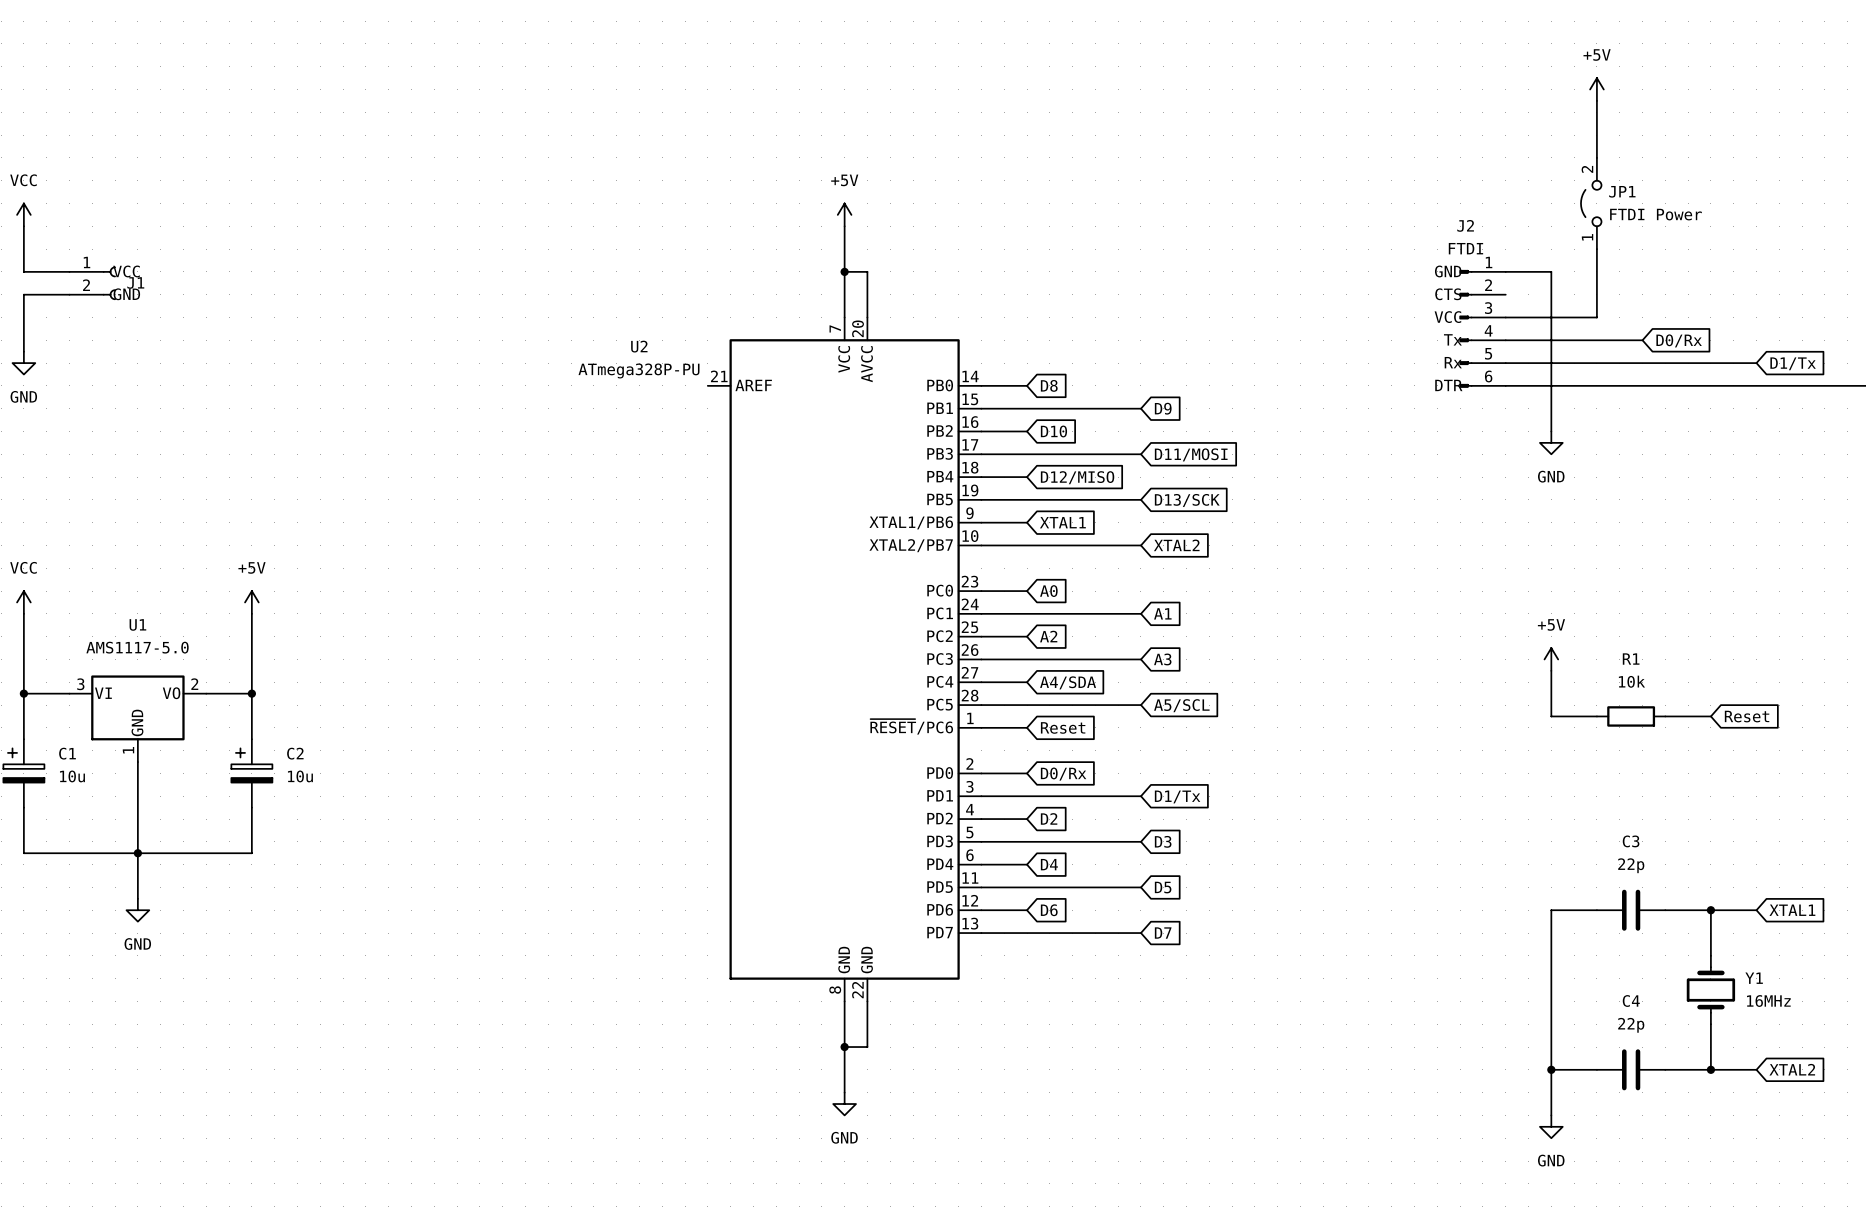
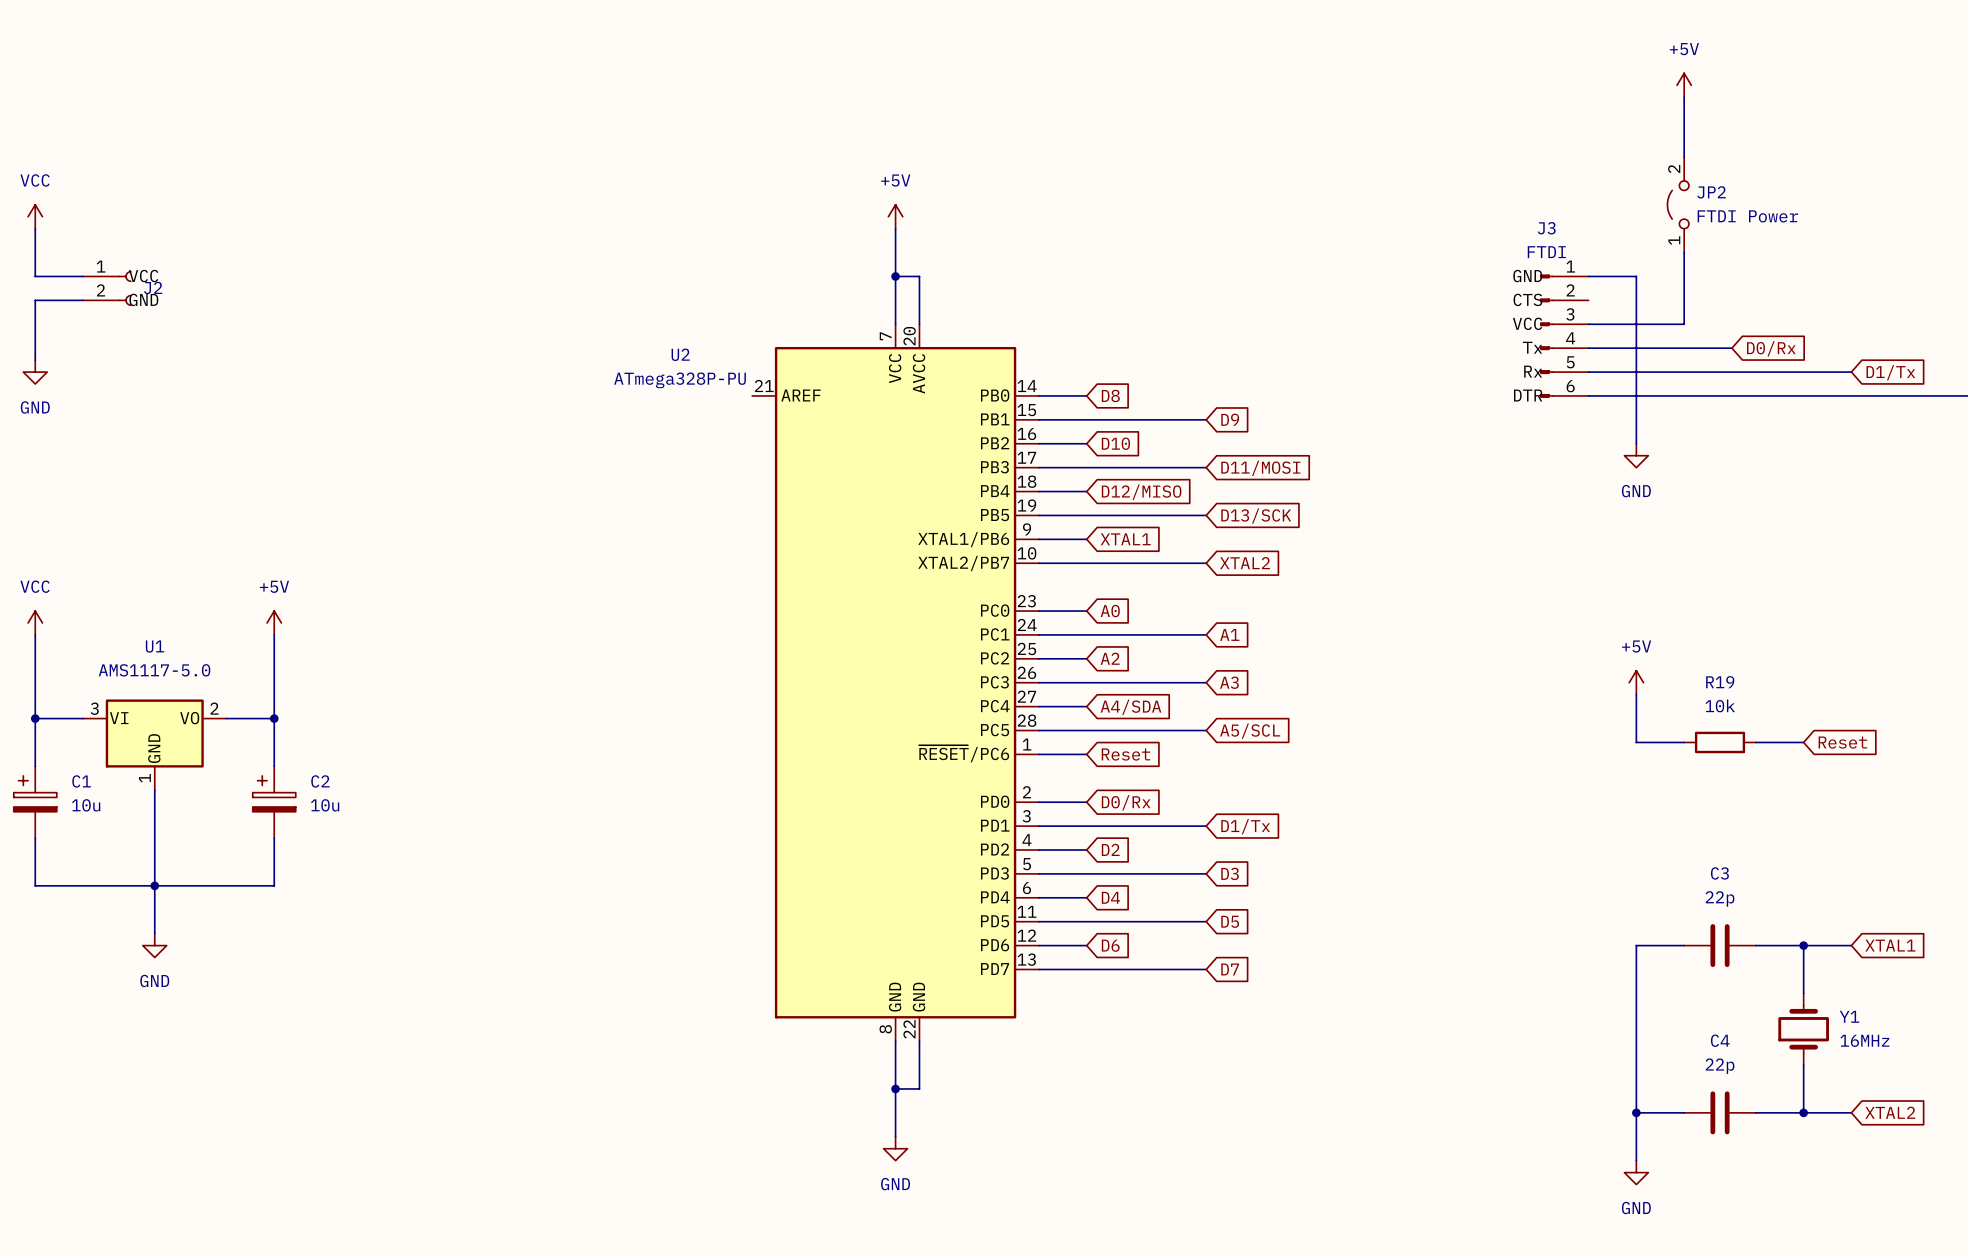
JP1 name: JP1 (1622, 191) -> JP2 (1711, 192)
J2 name: J2 (1465, 225) -> J3 (1546, 228)
J1 name: J1 (135, 282) -> J2 (153, 287)
R1 name: R1 (1631, 659) -> R19 (1720, 682)

